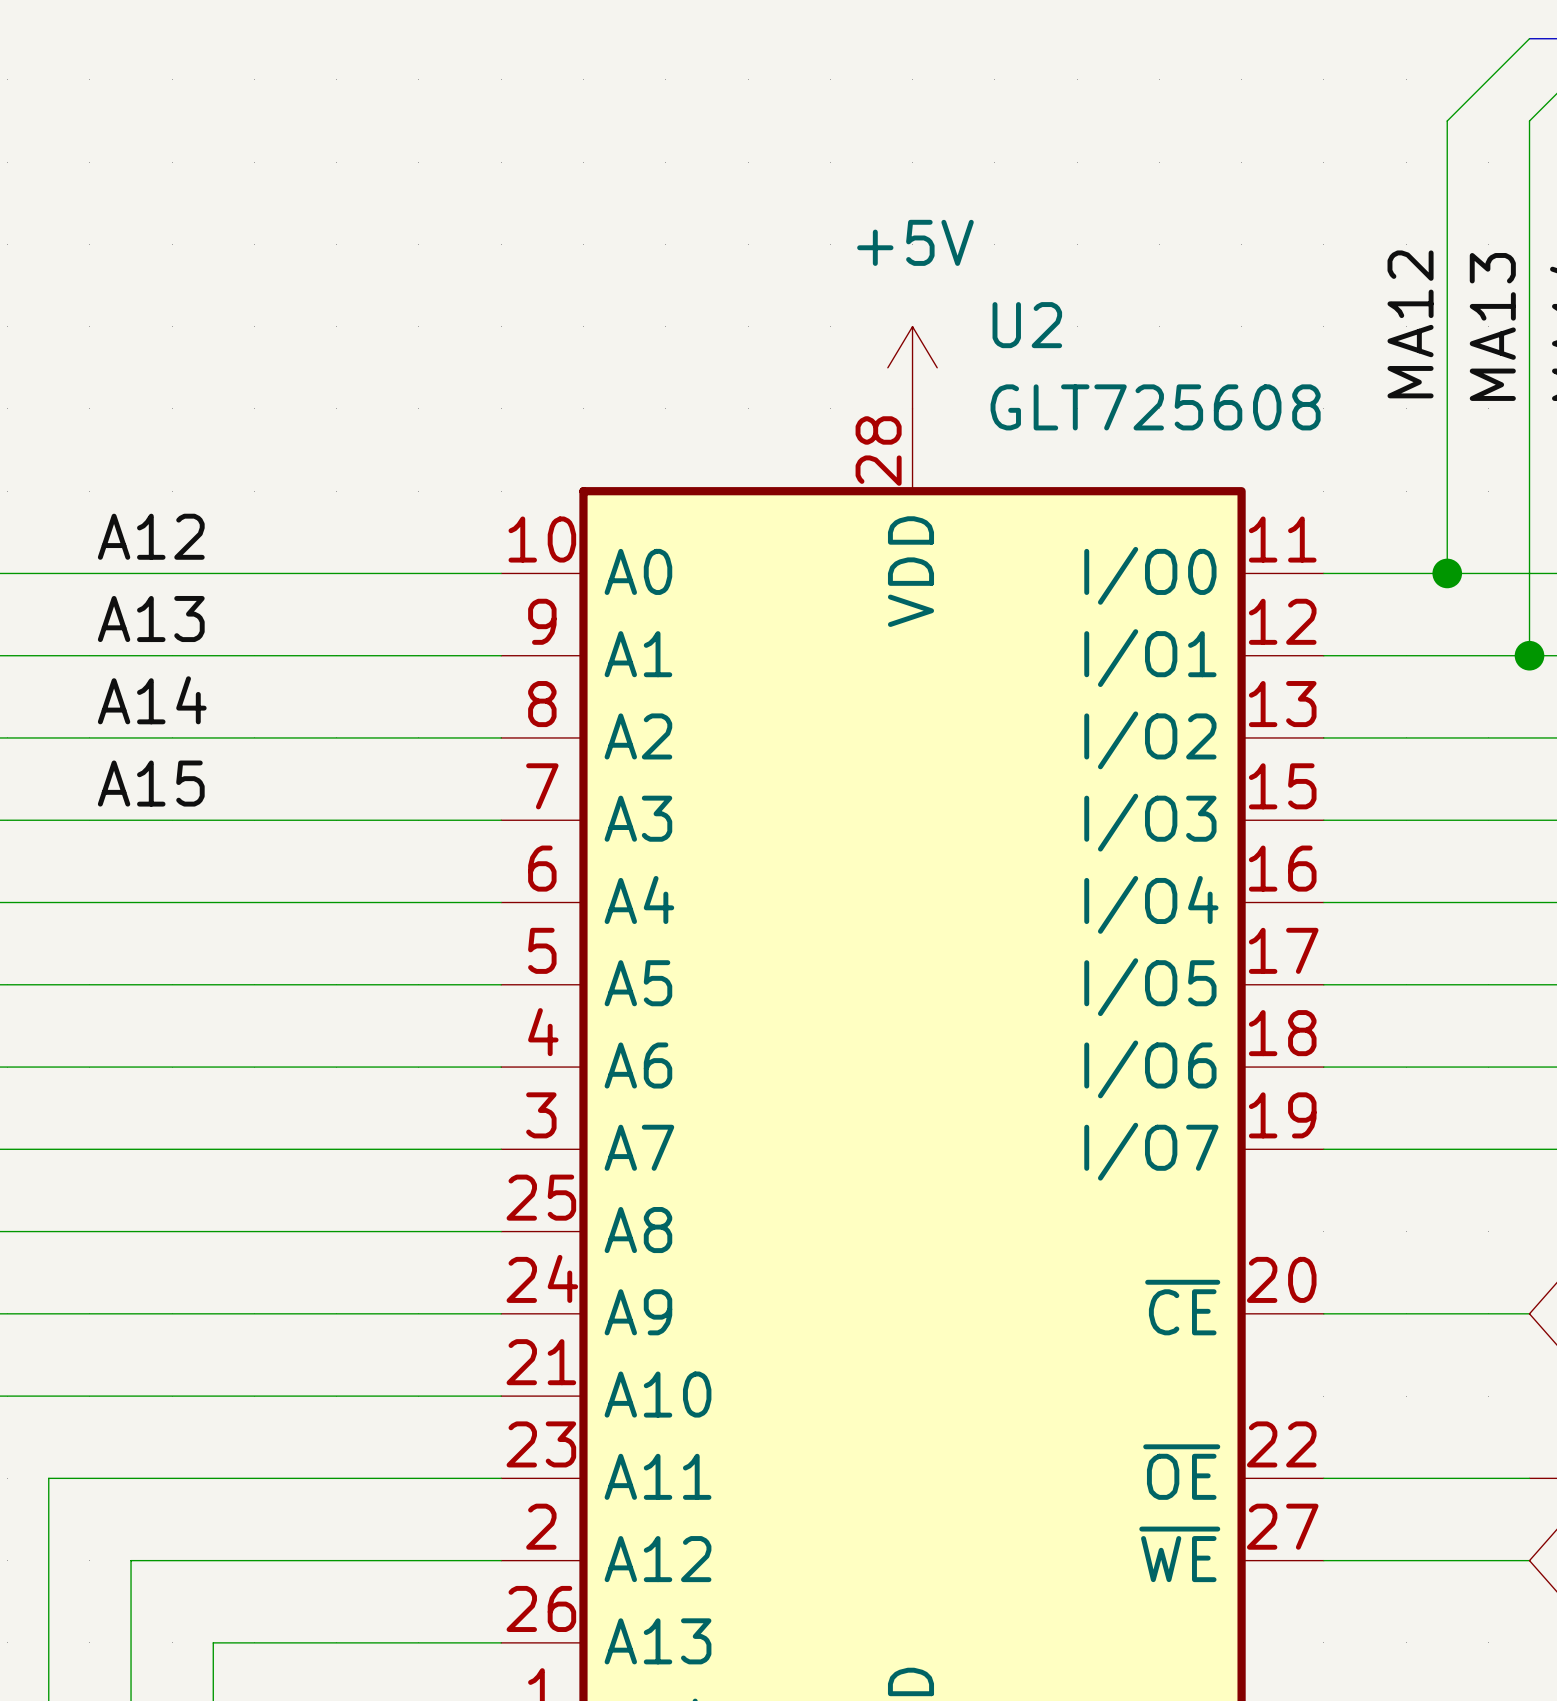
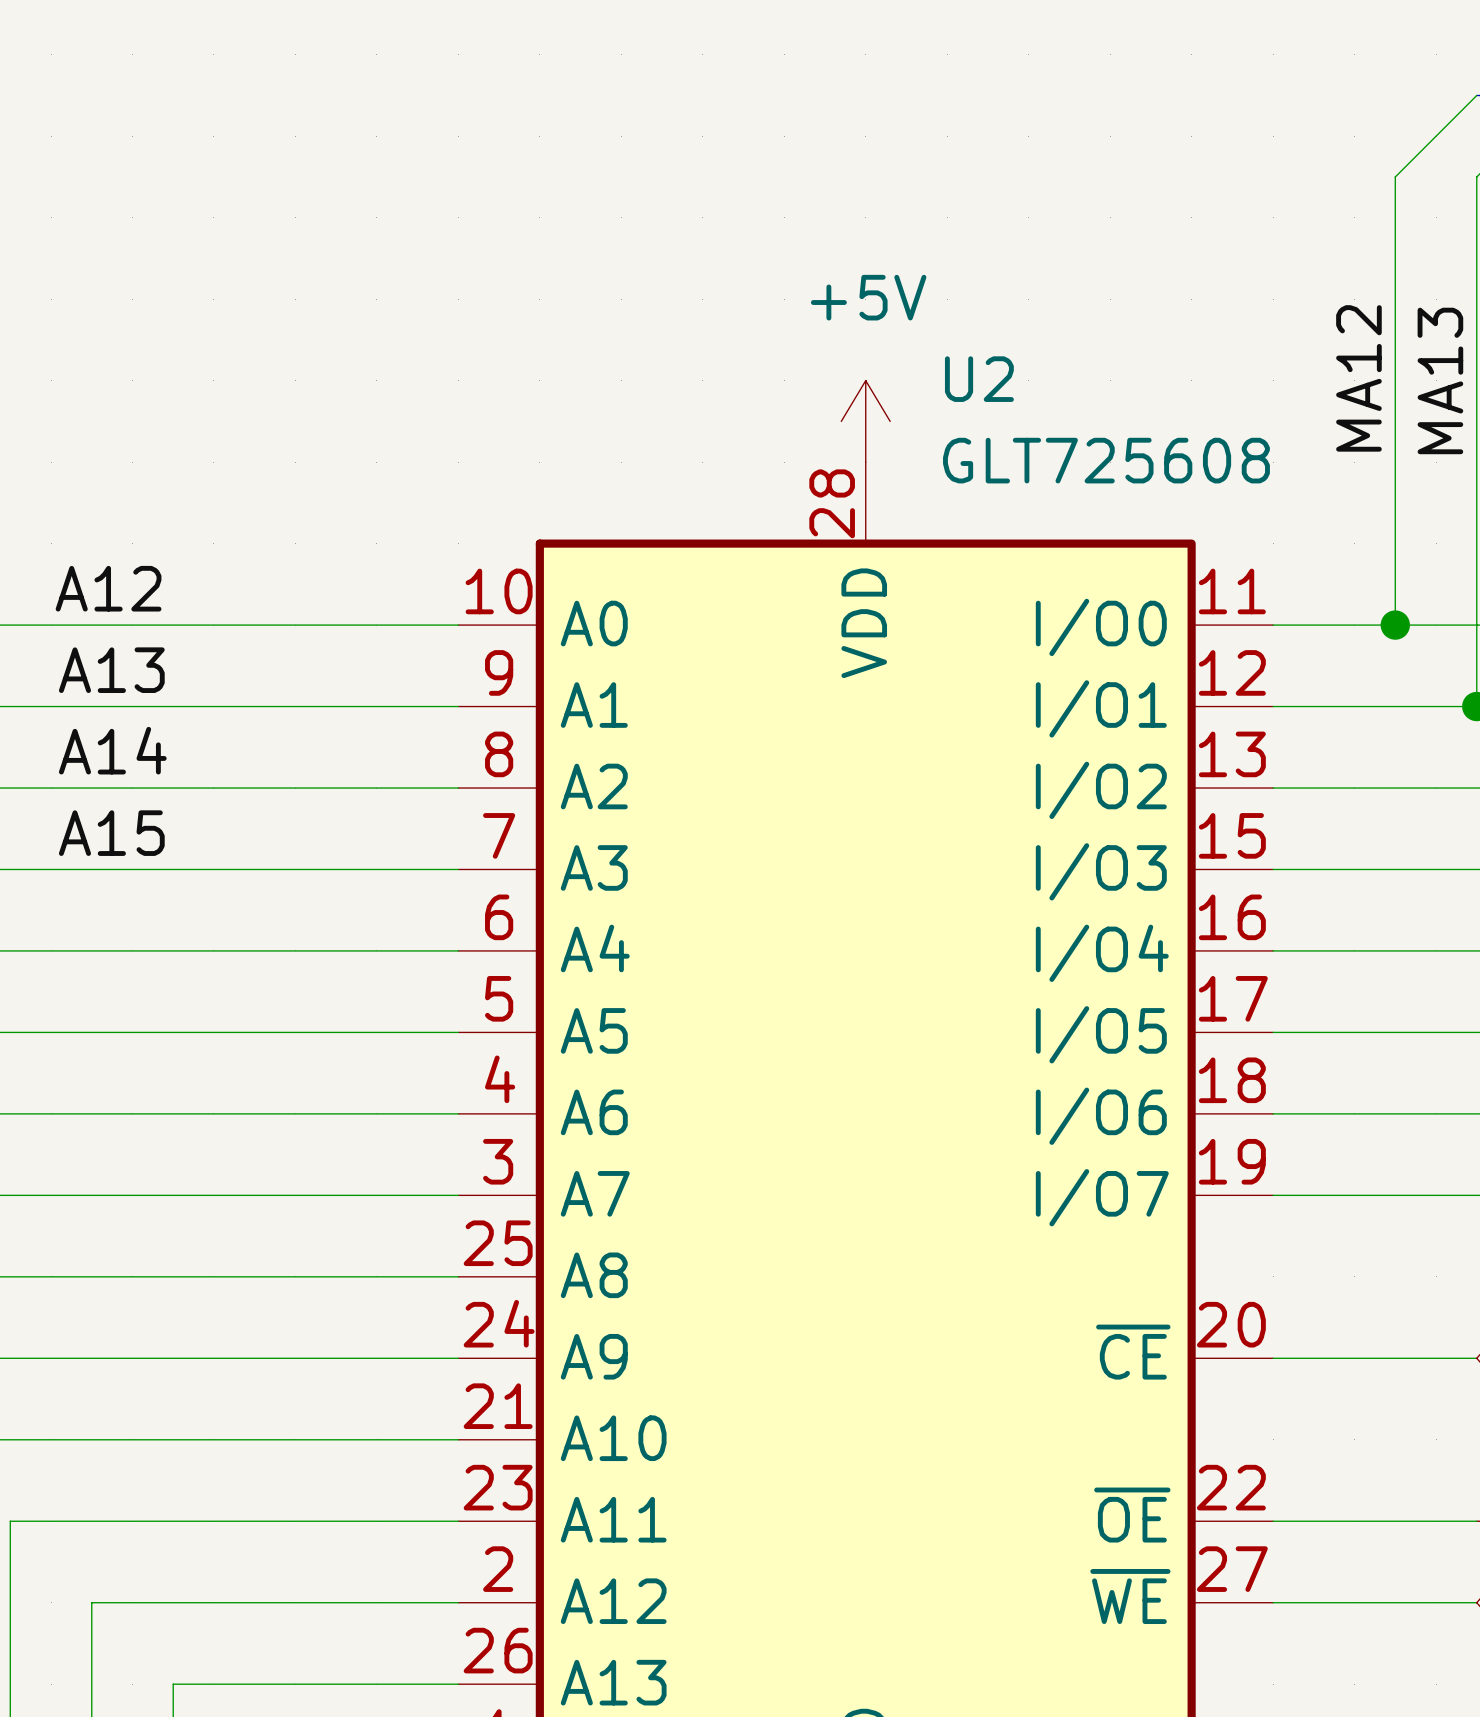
label position: A12 (151, 536) -> A12 (108, 588)

